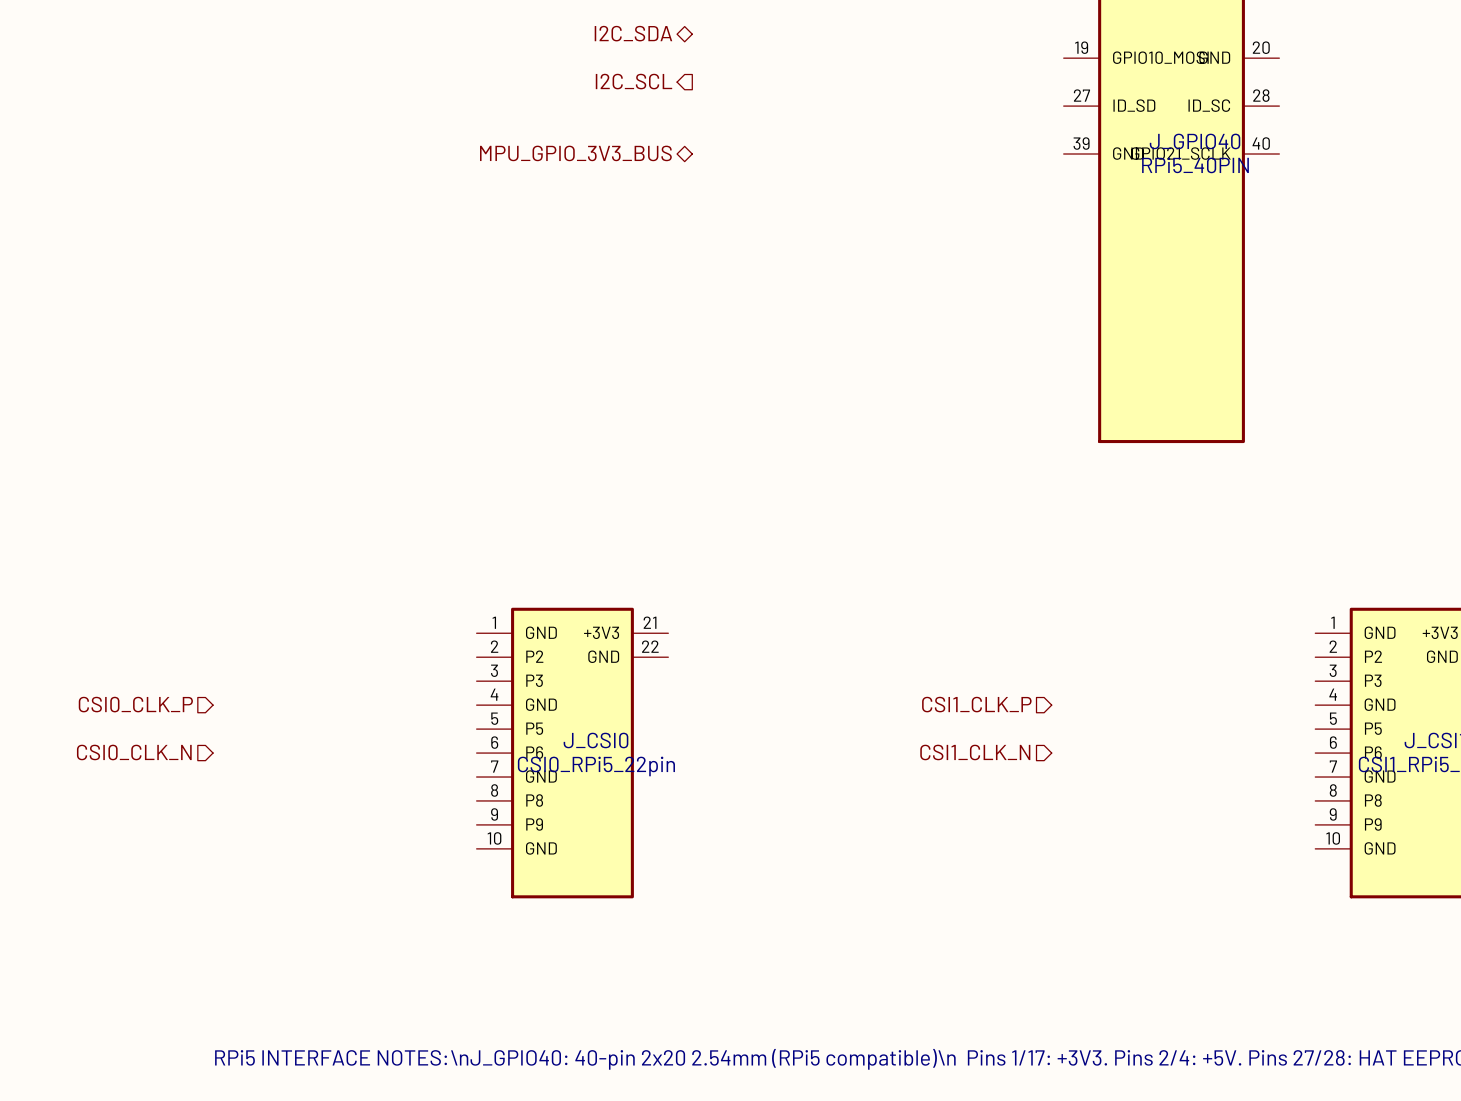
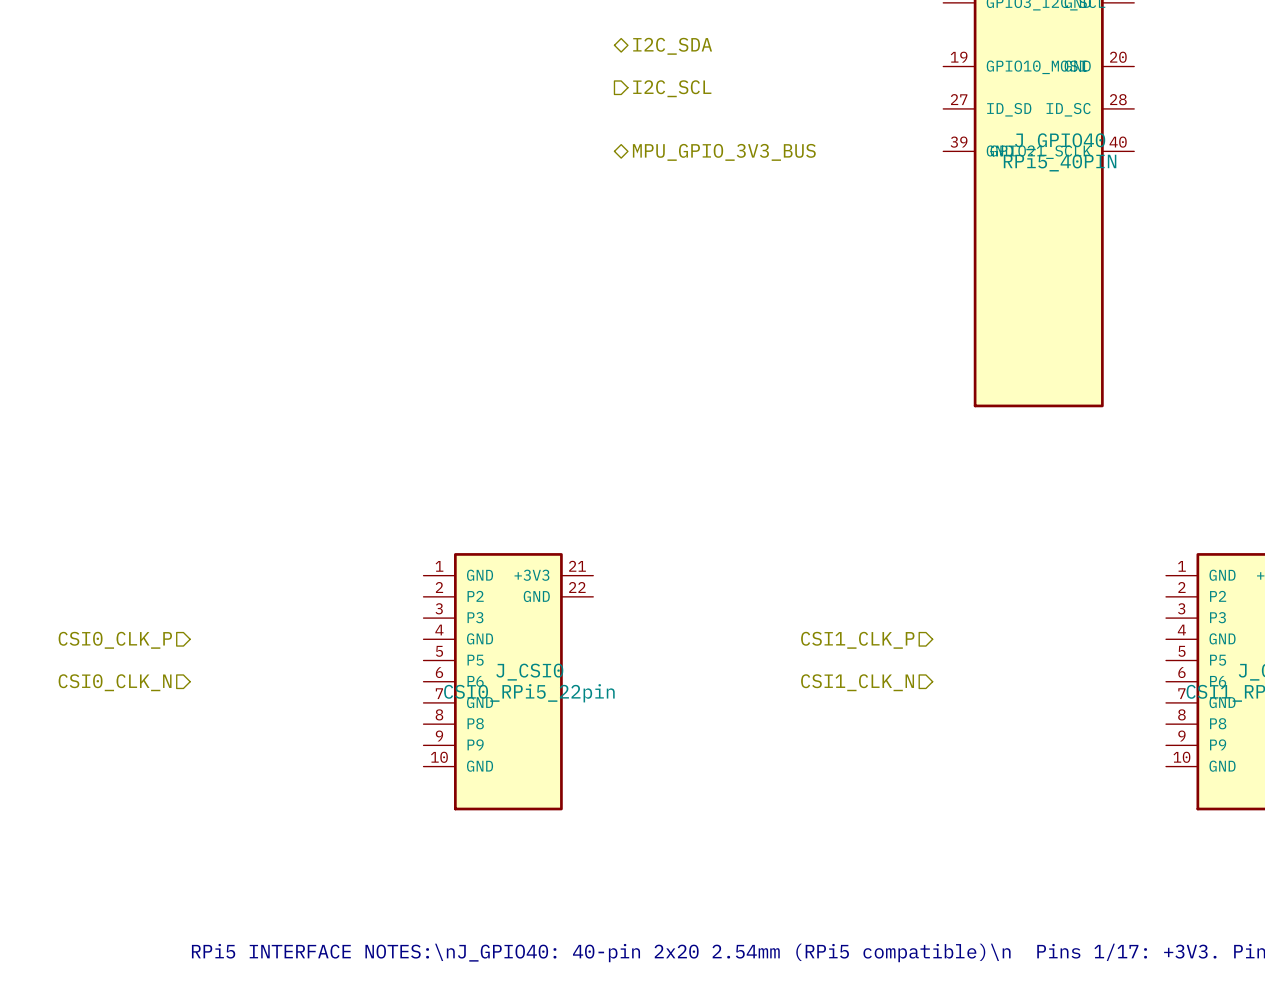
hierarchical label rotation: 0° (633, 33) -> 180° (672, 46)
hierarchical label position: I2C_SDA (633, 33) -> I2C_SDA (672, 46)
hierarchical label rotation: 0° (633, 81) -> 180° (672, 88)
hierarchical label position: I2C_SCL (633, 81) -> I2C_SCL (672, 88)
hierarchical label rotation: 0° (575, 153) -> 180° (724, 152)
hierarchical label position: MPU_GPIO_3V3_BUS (575, 153) -> MPU_GPIO_3V3_BUS (724, 152)

